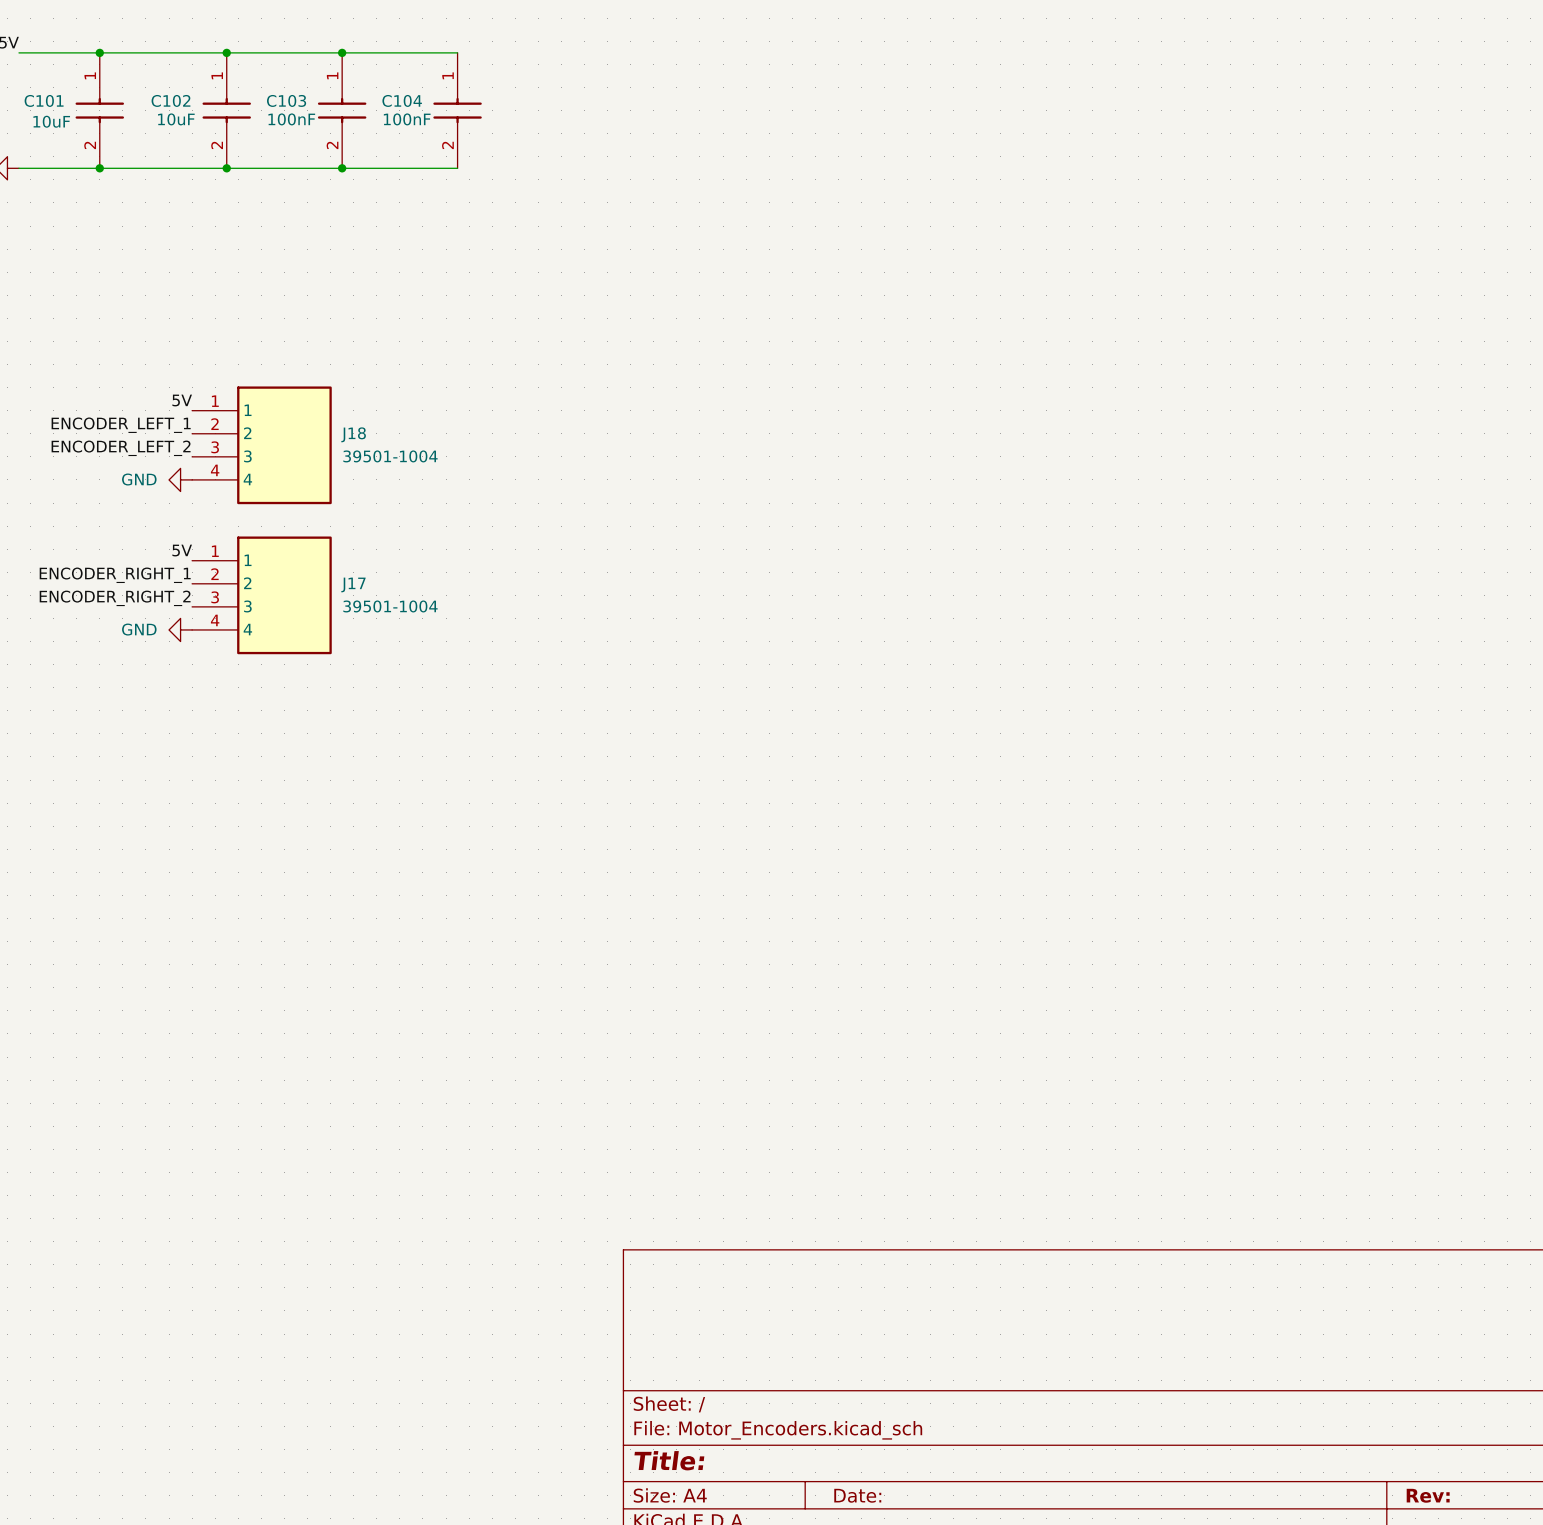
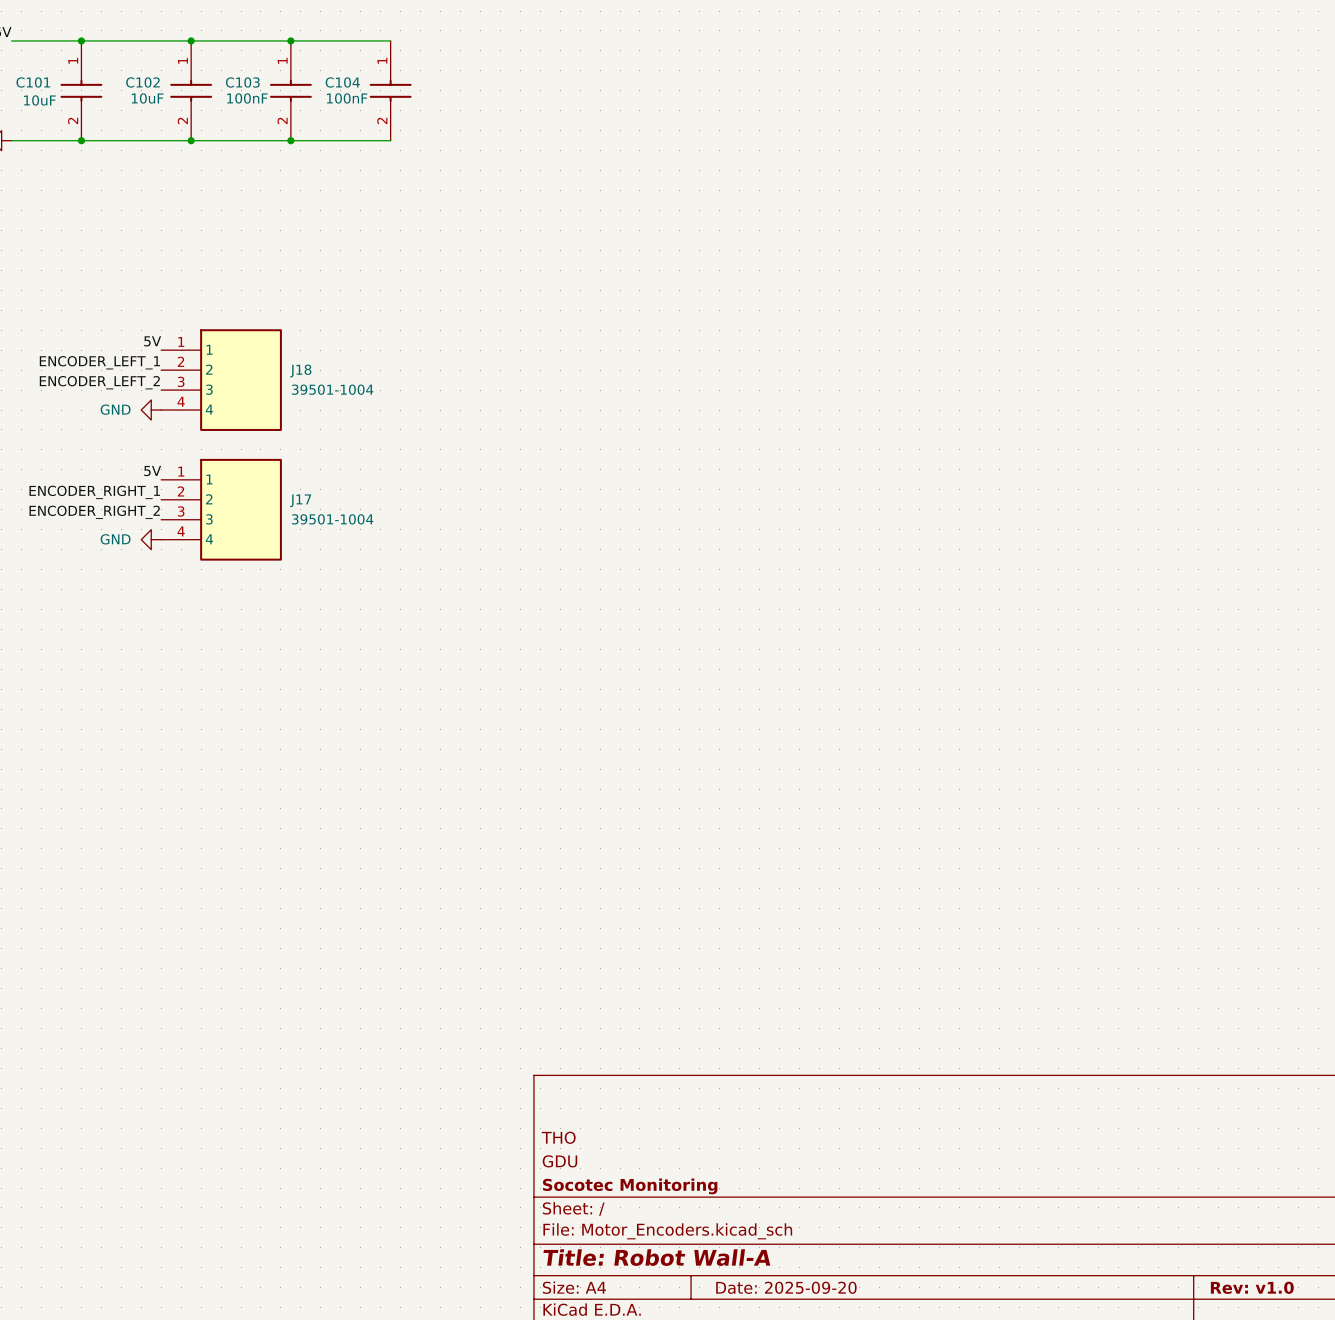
title block: none -> THO (558, 1137)
title block: none -> GDU (559, 1161)
title block: none -> Socotec Monitoring (630, 1186)
title block: Title: (669, 1460) -> Title: Robot Wall-A (656, 1257)
title block: Date: (857, 1495) -> Date: 2025-09-20 (786, 1287)
title block: Rev: (1428, 1495) -> Rev: v1.0 (1252, 1287)

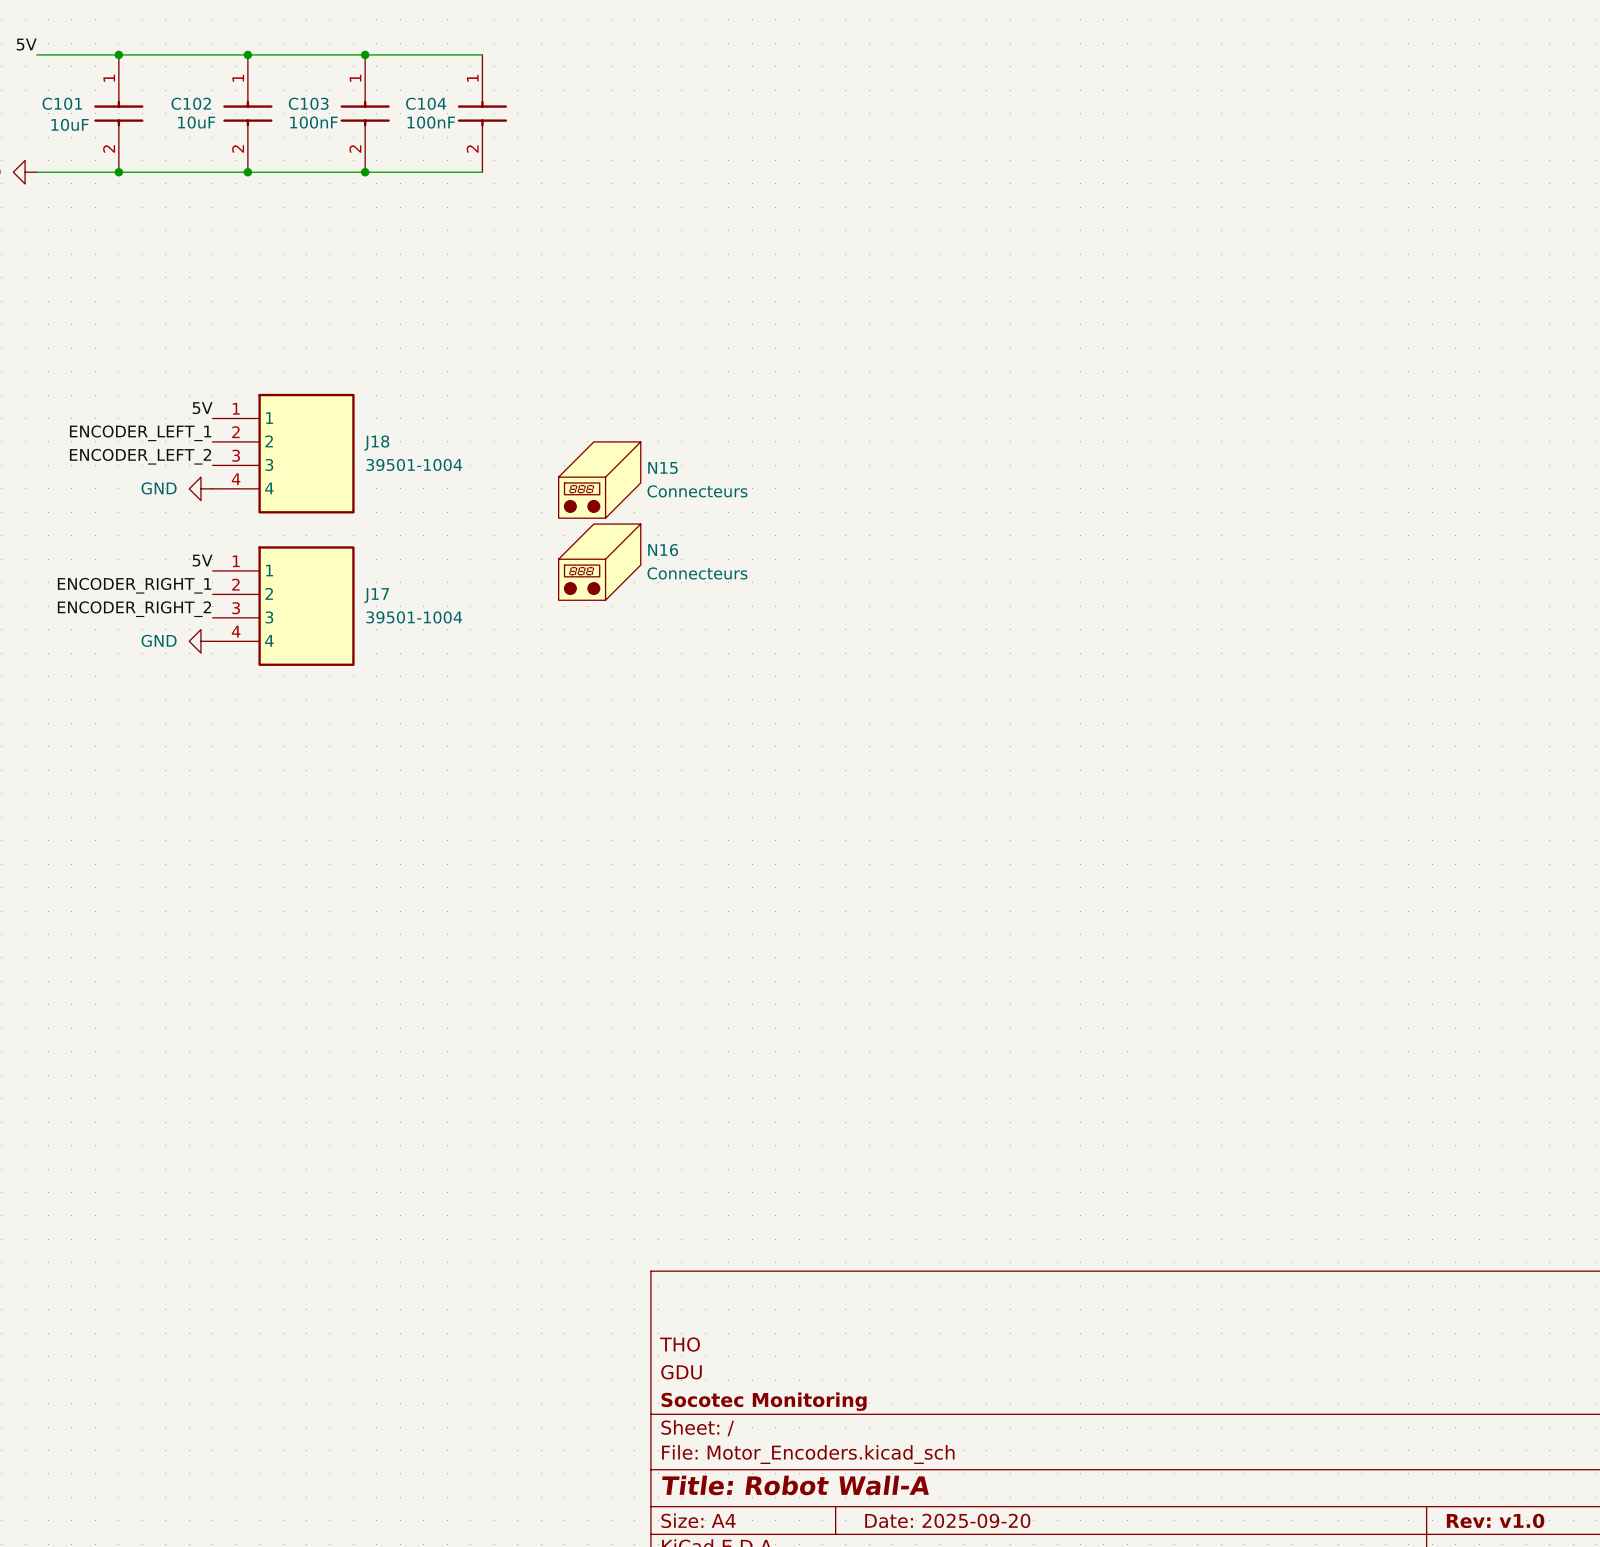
N15: none -> Connecteurs (599, 480)
N16: none -> Connecteurs (599, 562)

